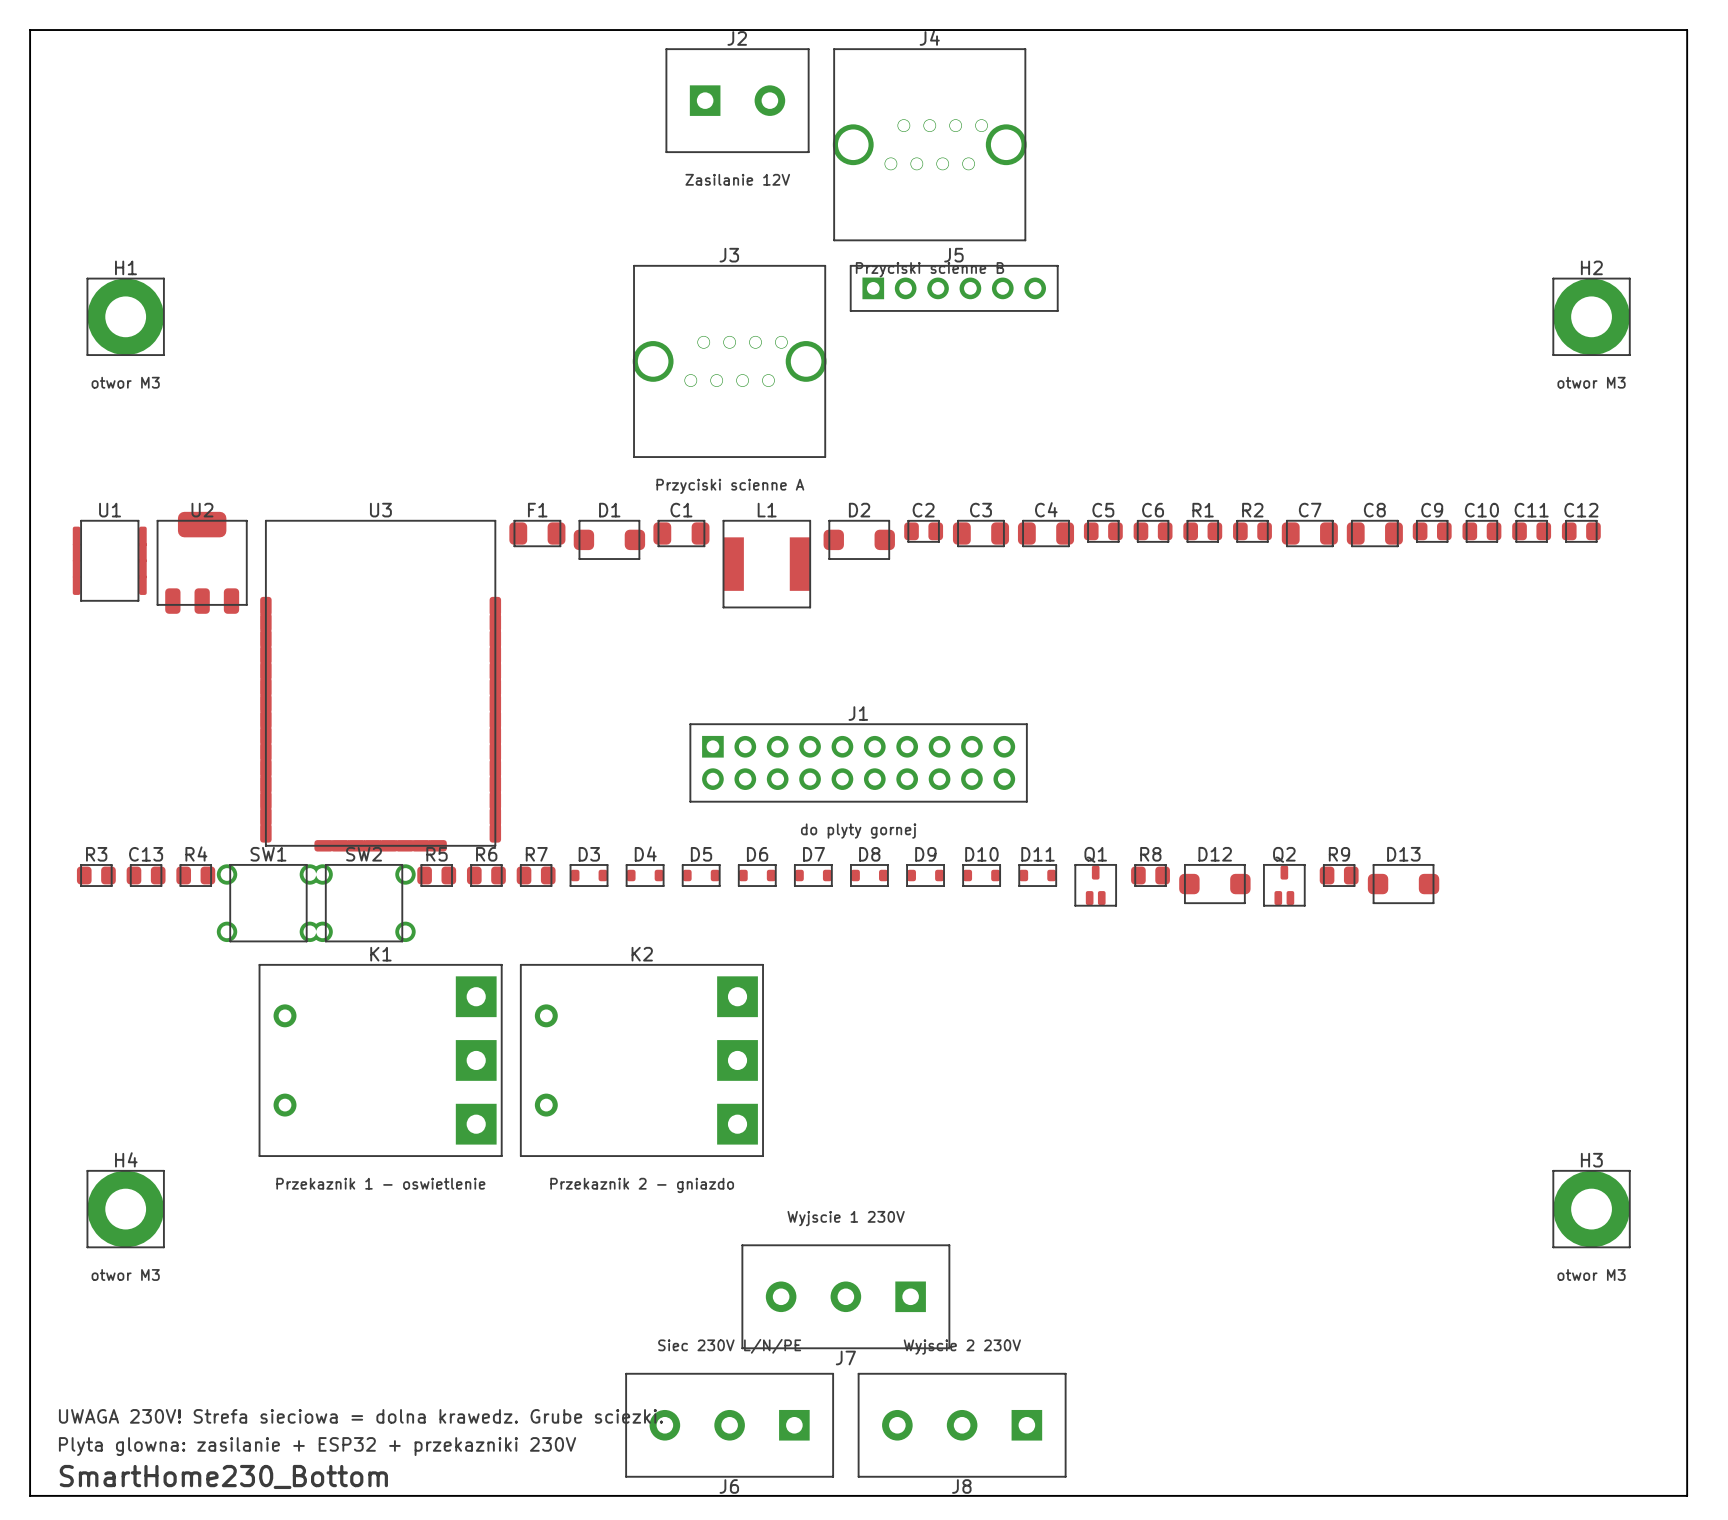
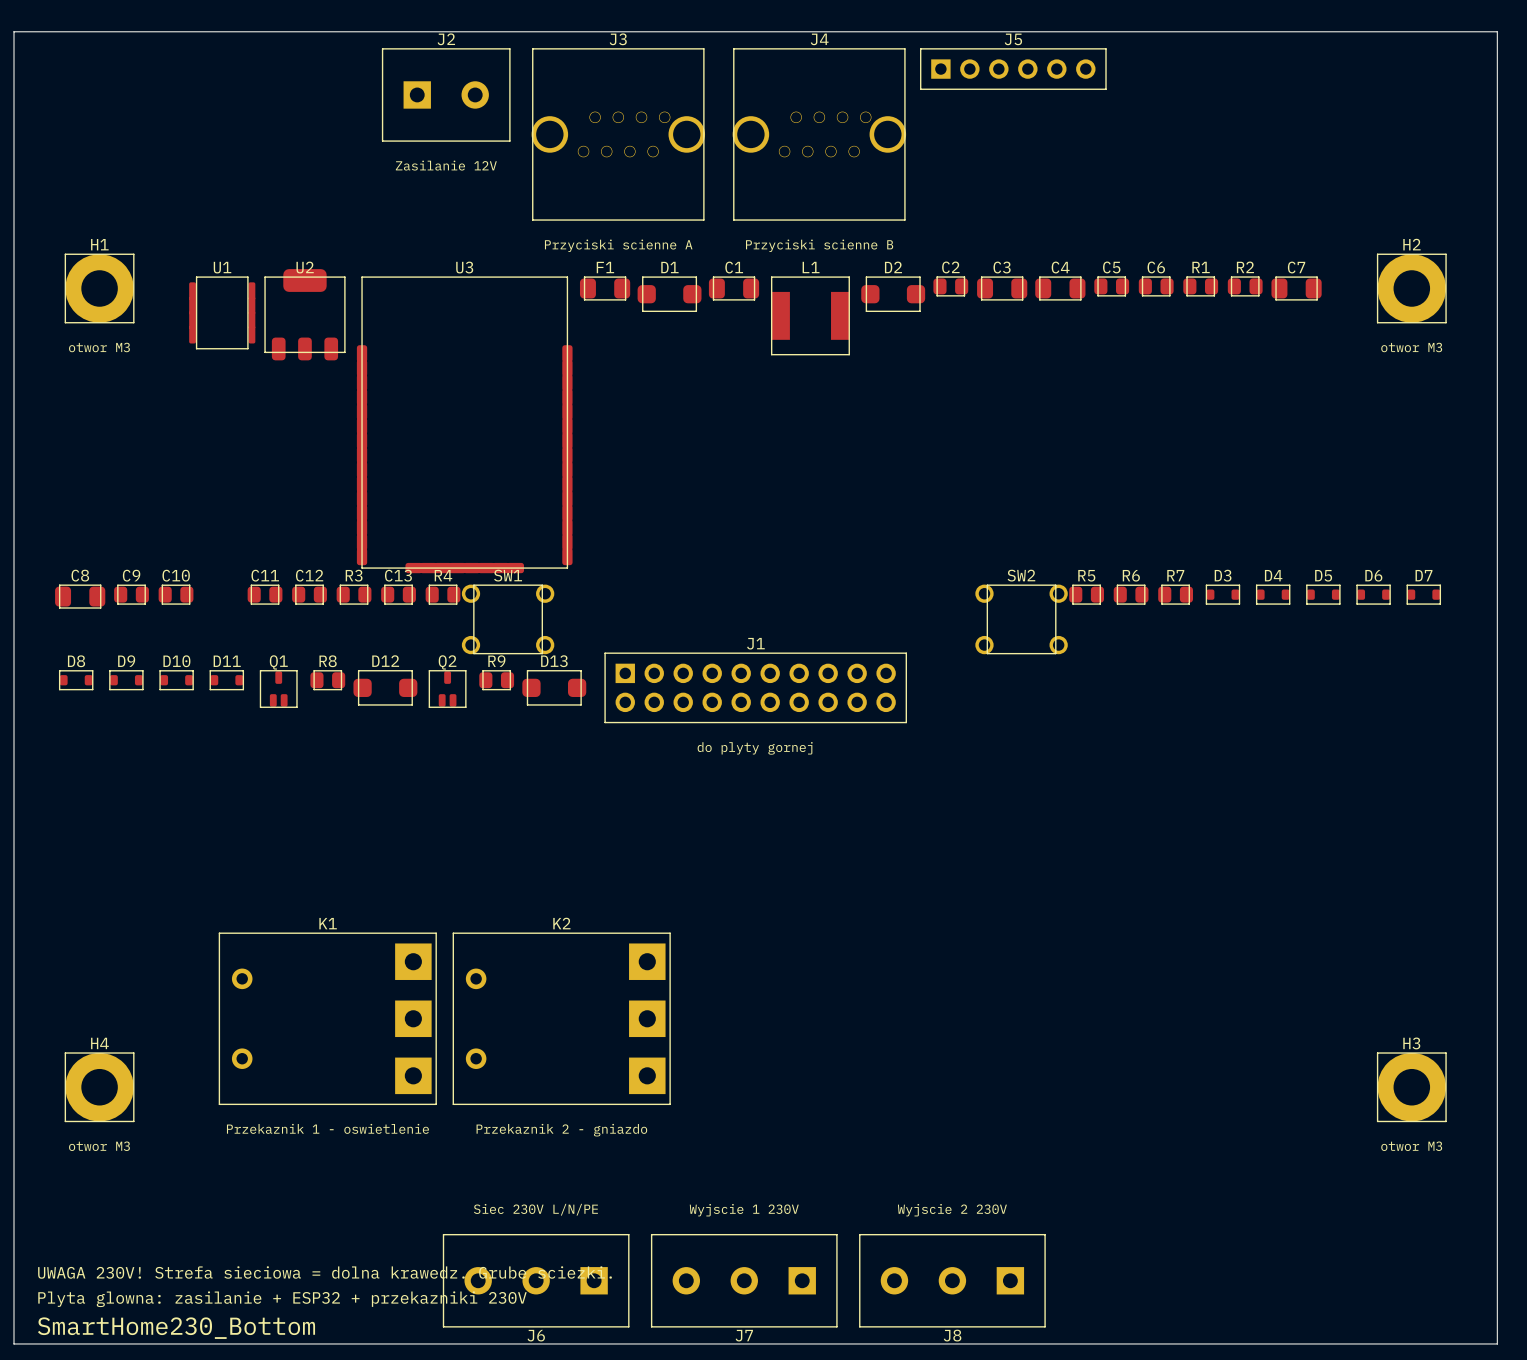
J2 position: (737, 100) -> (446, 94)
J5 position: (954, 288) -> (1013, 69)
J3 position: (729, 361) -> (618, 134)
C2 position: (923, 531) -> (950, 286)
C5 position: (1103, 531) -> (1111, 286)
C6 position: (1153, 531) -> (1156, 286)
R1 position: (1202, 531) -> (1200, 286)
R2 position: (1252, 531) -> (1245, 286)
C9 position: (1432, 531) -> (131, 594)
C10 position: (1481, 531) -> (176, 594)
C11 position: (1531, 531) -> (265, 594)
C12 position: (1581, 531) -> (309, 594)
F1 position: (537, 533) -> (605, 288)
C1 position: (681, 533) -> (734, 288)
C3 position: (980, 533) -> (1002, 288)
C4 position: (1045, 533) -> (1060, 288)
C7 position: (1309, 533) -> (1296, 288)
C8 position: (1374, 533) -> (80, 596)
D1 position: (609, 539) -> (669, 294)
D2 position: (859, 539) -> (893, 294)
U1 position: (109, 560) -> (222, 312)
U2 position: (202, 562) -> (304, 314)
L1 position: (766, 564) -> (810, 315)
U3 position: (380, 685) -> (464, 424)
R3 position: (96, 875) -> (354, 594)
C13 position: (146, 875) -> (398, 594)
R4 position: (195, 875) -> (443, 594)
R5 position: (436, 875) -> (1086, 594)
R6 position: (486, 875) -> (1131, 594)
R7 position: (536, 875) -> (1175, 594)
D3 position: (589, 875) -> (1222, 594)
D4 position: (645, 875) -> (1273, 594)
D5 position: (701, 875) -> (1323, 594)
D6 position: (757, 875) -> (1373, 594)
D7 position: (813, 875) -> (1423, 594)
D8 position: (869, 875) -> (76, 680)
D9 position: (925, 875) -> (126, 680)
D10 position: (981, 875) -> (176, 680)
D11 position: (1037, 875) -> (226, 680)
R8 position: (1150, 875) -> (327, 680)
R9 position: (1339, 875) -> (496, 680)
D12 position: (1214, 884) -> (385, 687)
D13 position: (1403, 884) -> (554, 687)
Q1 position: (1095, 885) -> (278, 689)
Q2 position: (1284, 885) -> (447, 689)
SW1 position: (268, 903) -> (508, 619)
SW2 position: (364, 903) -> (1021, 619)
K1 position: (380, 1060) -> (327, 1018)
K2 position: (641, 1060) -> (561, 1018)
J7 position: (845, 1296) -> (744, 1280)
J6 position: (729, 1425) -> (536, 1280)
J8 position: (962, 1425) -> (952, 1280)

